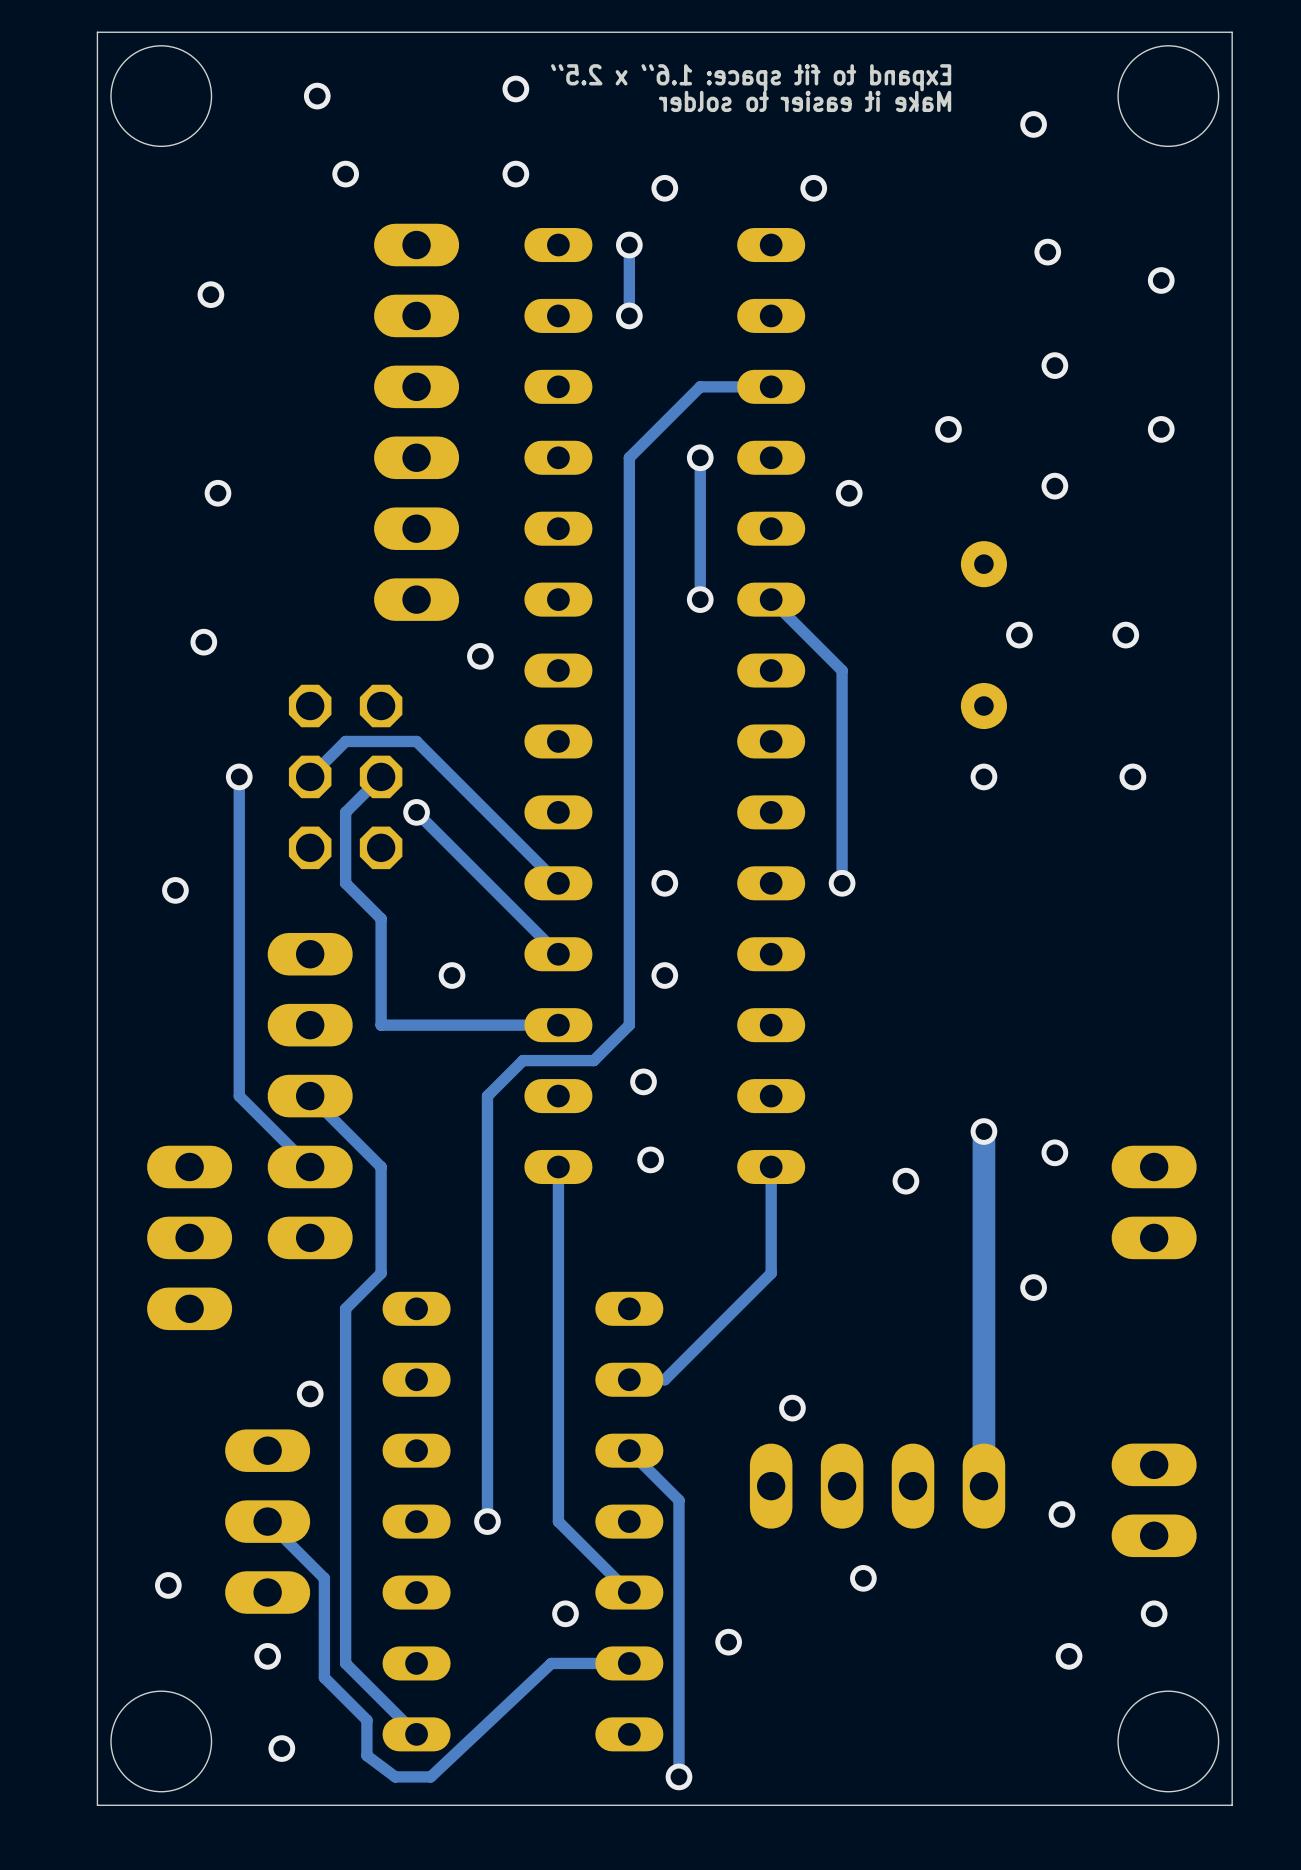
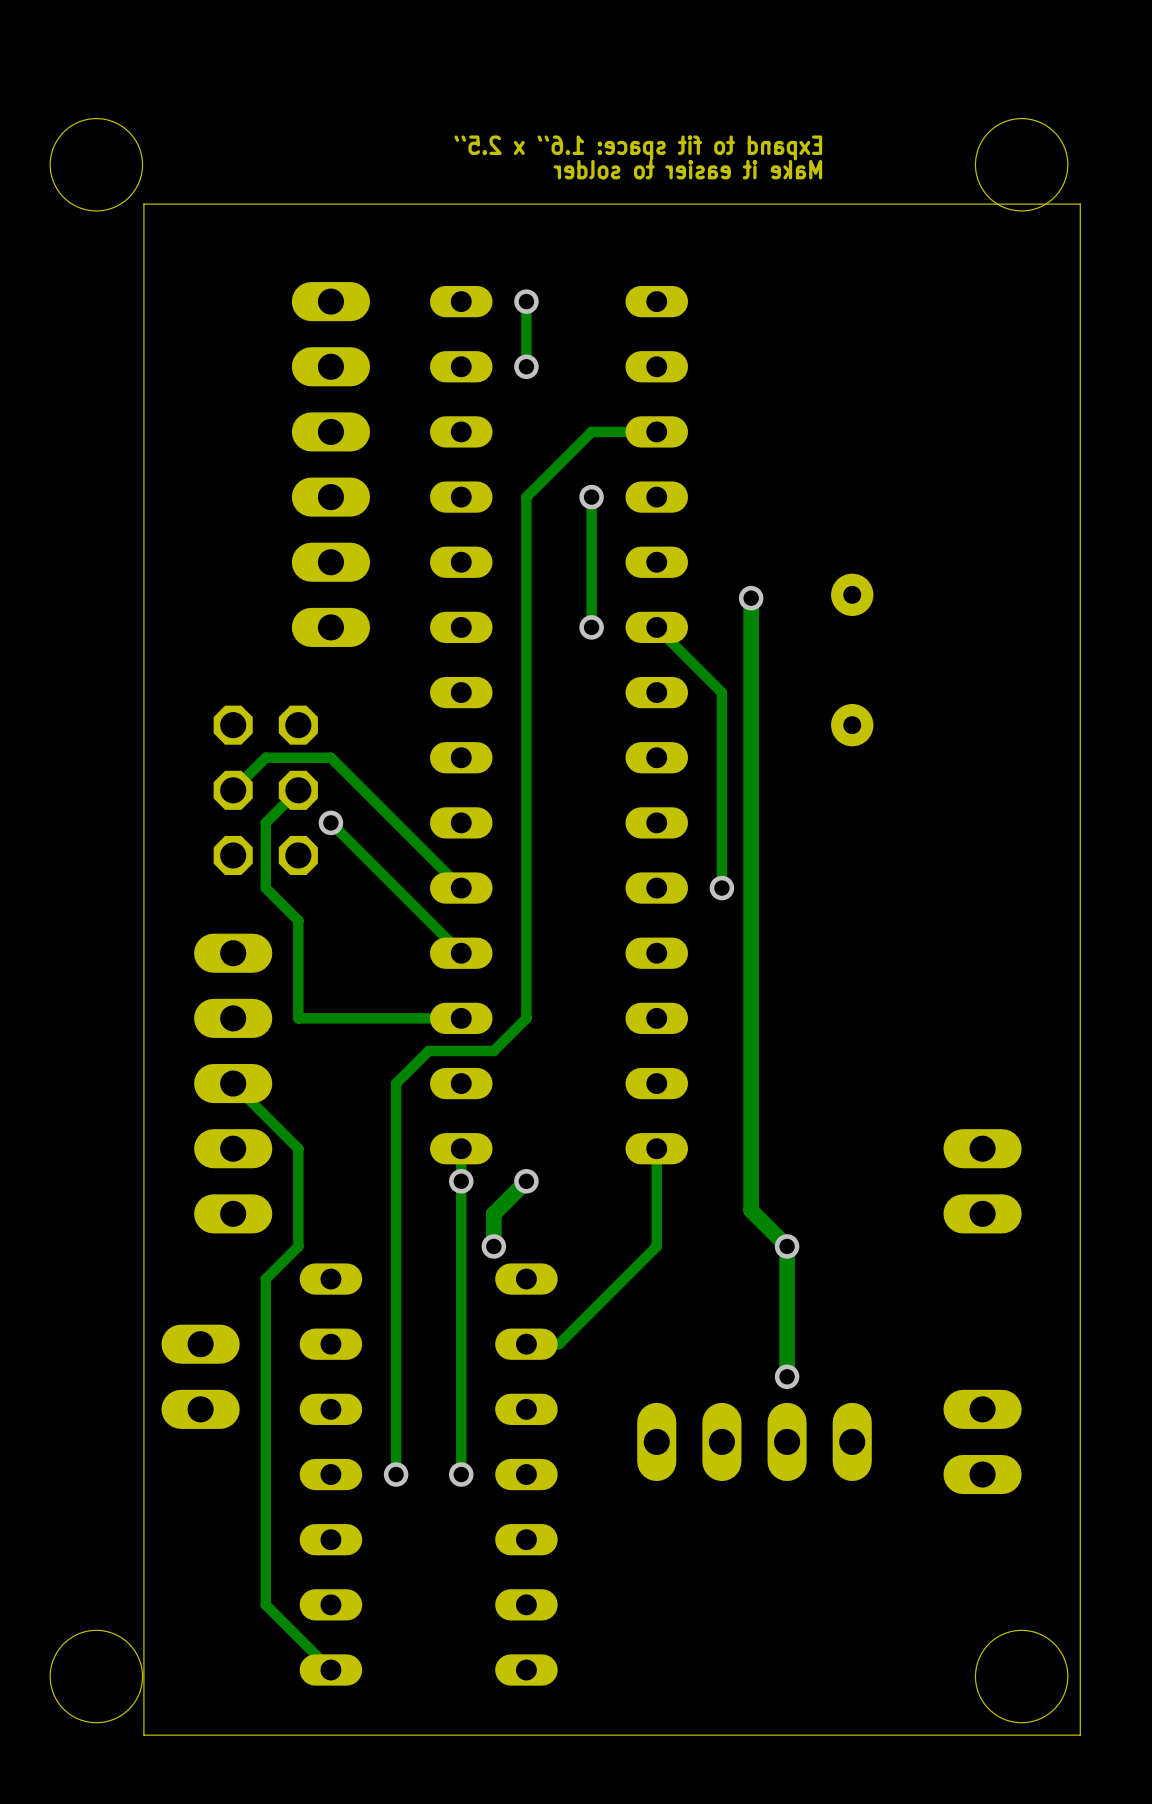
via: (515, 88) -> none
via: (317, 96) -> none
via: (1033, 124) -> none
board edge: (1232, 138) (1232, 32) (97, 32) (97, 1805) (213, 1805) -> (1080, 204) (143, 204) (143, 1735)
via: (345, 174) -> none
via: (515, 174) -> none
via: (664, 188) -> none
via: (813, 188) -> none
via: (1047, 252) -> none
via: (1161, 280) -> none
via: (210, 294) -> none
via: (1054, 365) -> none
via: (948, 429) -> none
via: (1161, 429) -> none
via: (1054, 486) -> none
via: (217, 493) -> none
via: (849, 493) -> none
track: none -> (751, 598) (751, 1210) (787, 1246) (787, 1376)
via: none -> (751, 598)
via: (1019, 635) -> none
via: (1125, 635) -> none
via: (203, 642) -> none
via: (480, 656) -> none
track: (239, 776) (239, 1096) (310, 1166) -> none
via: (239, 776) -> none
via: (983, 776) -> none
via: (1132, 776) -> none
via: (664, 883) -> none
via: (175, 890) -> none
via: (452, 975) -> none
via: (664, 975) -> none
via: (643, 1081) -> none
track: (983, 1131) (983, 1486) -> none
via: (983, 1131) -> none
via: (1054, 1152) -> none
via position: (650, 1159) -> (526, 1181)
via: (905, 1181) -> none
via: none -> (461, 1181)
track: none -> (526, 1181) (493, 1213) (493, 1246)
part position: (1154, 1202) -> (982, 1181)
part: (189, 1237) -> none
via: none -> (493, 1246)
via: none -> (787, 1246)
via: (1033, 1287) -> none
via: (310, 1393) -> none
via: (792, 1408) -> none
part: none -> (200, 1376)
via: none -> (787, 1376)
track: (629, 1450) (678, 1500) (678, 1776) -> none
part position: (1154, 1500) -> (982, 1441)
via: (1061, 1514) -> none
track: (267, 1521) (324, 1578) (324, 1677) (366, 1720) (366, 1755) (395, 1776) (430, 1776) (551, 1663) (629, 1663) -> none
part: (267, 1521) -> none
track: (558, 1521) (629, 1592) -> none
via: (863, 1578) -> none
via: (168, 1585) -> none
via position: (565, 1613) -> (461, 1474)
via: (1154, 1613) -> none
via: (728, 1642) -> none
via: (267, 1656) -> none
via: (1069, 1656) -> none
via: (281, 1748) -> none
via: (678, 1776) -> none

